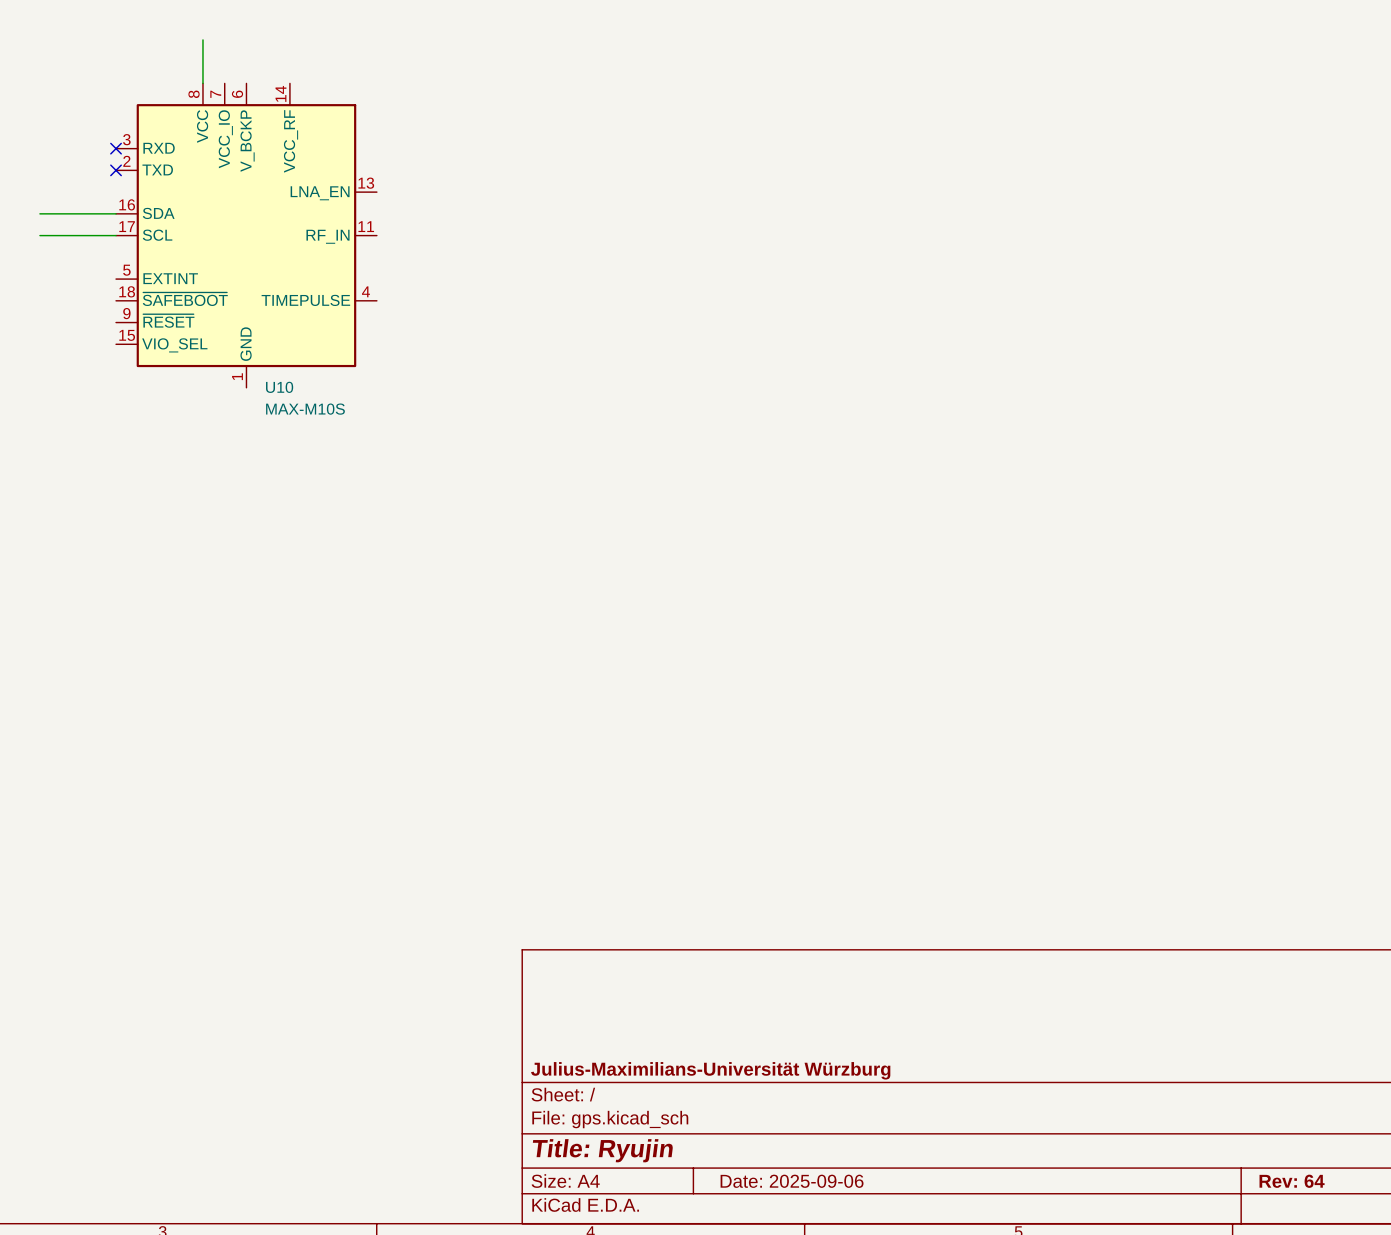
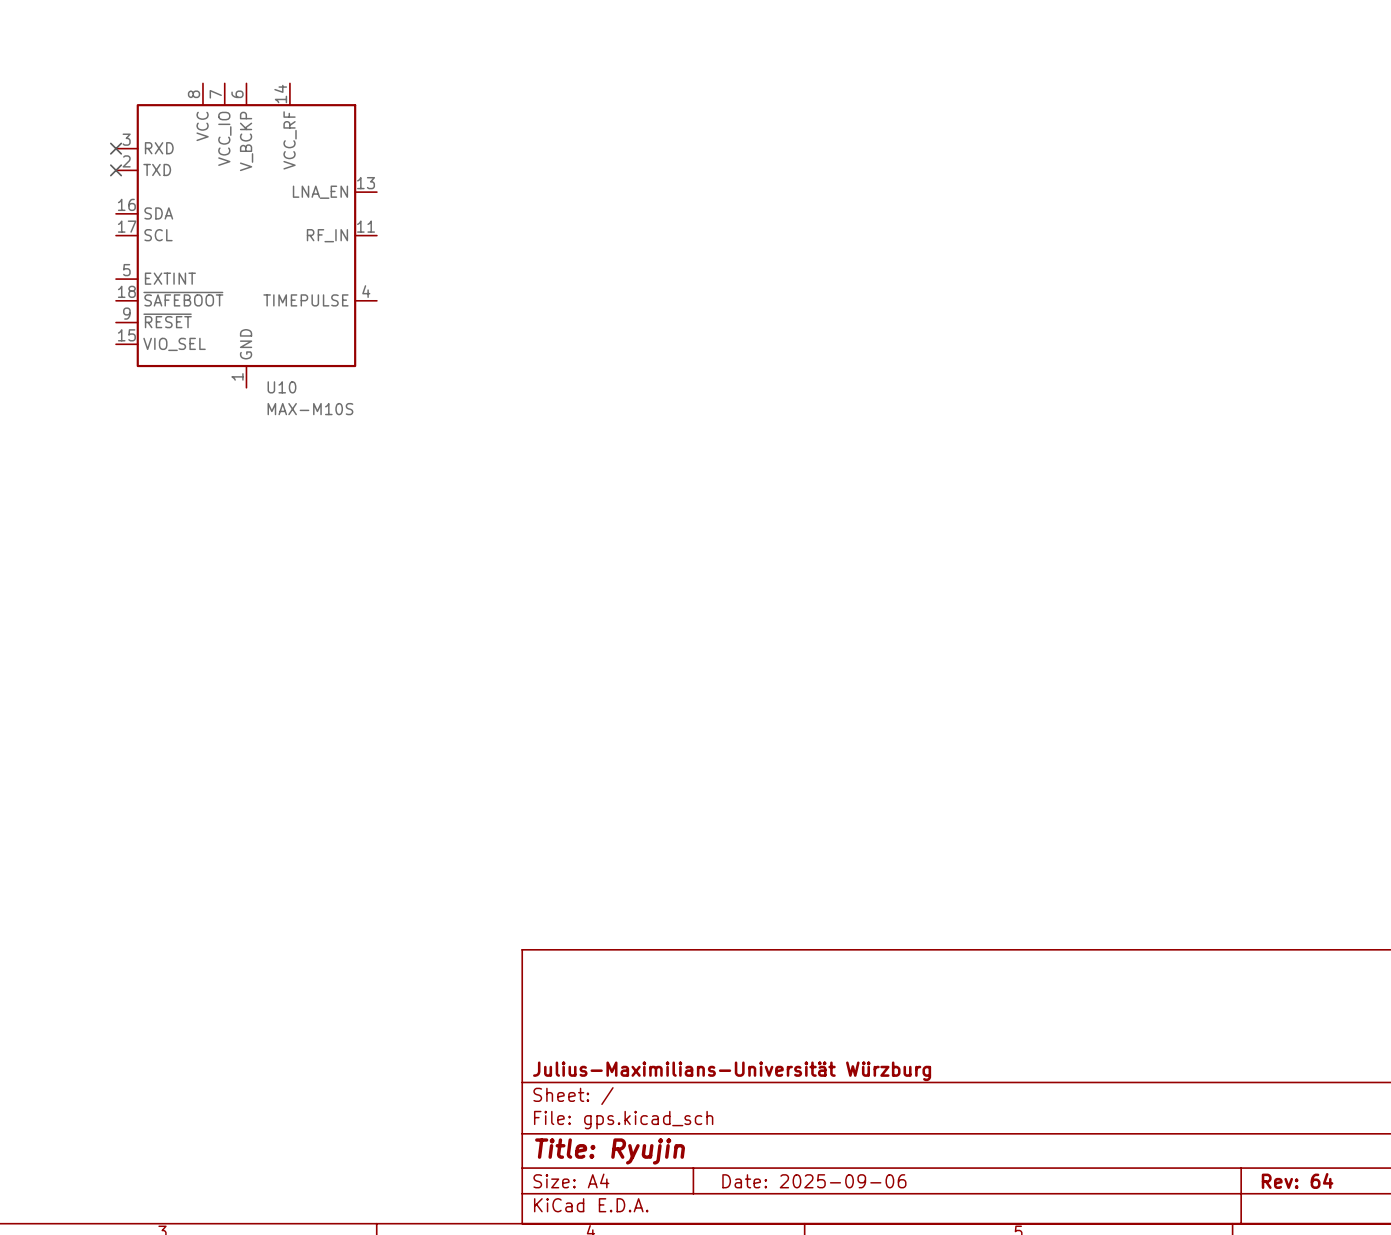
wire: (202, 39) (202, 83) -> none
wire: (39, 213) (116, 213) -> none
wire: (39, 235) (116, 235) -> none

